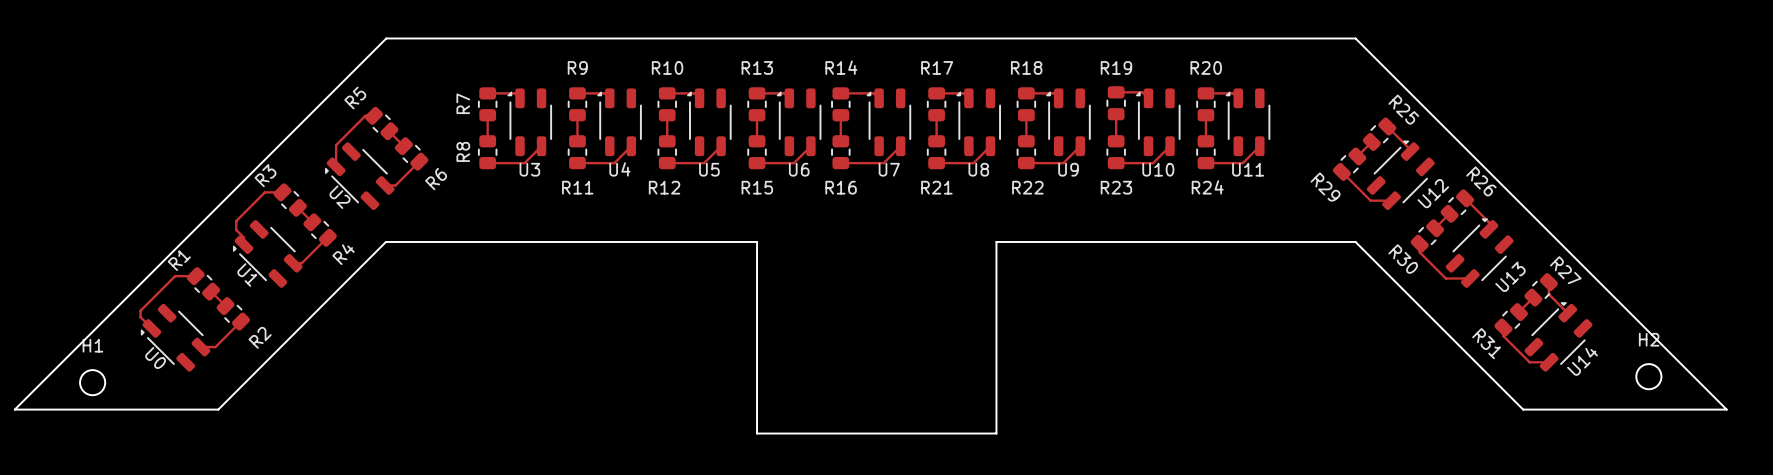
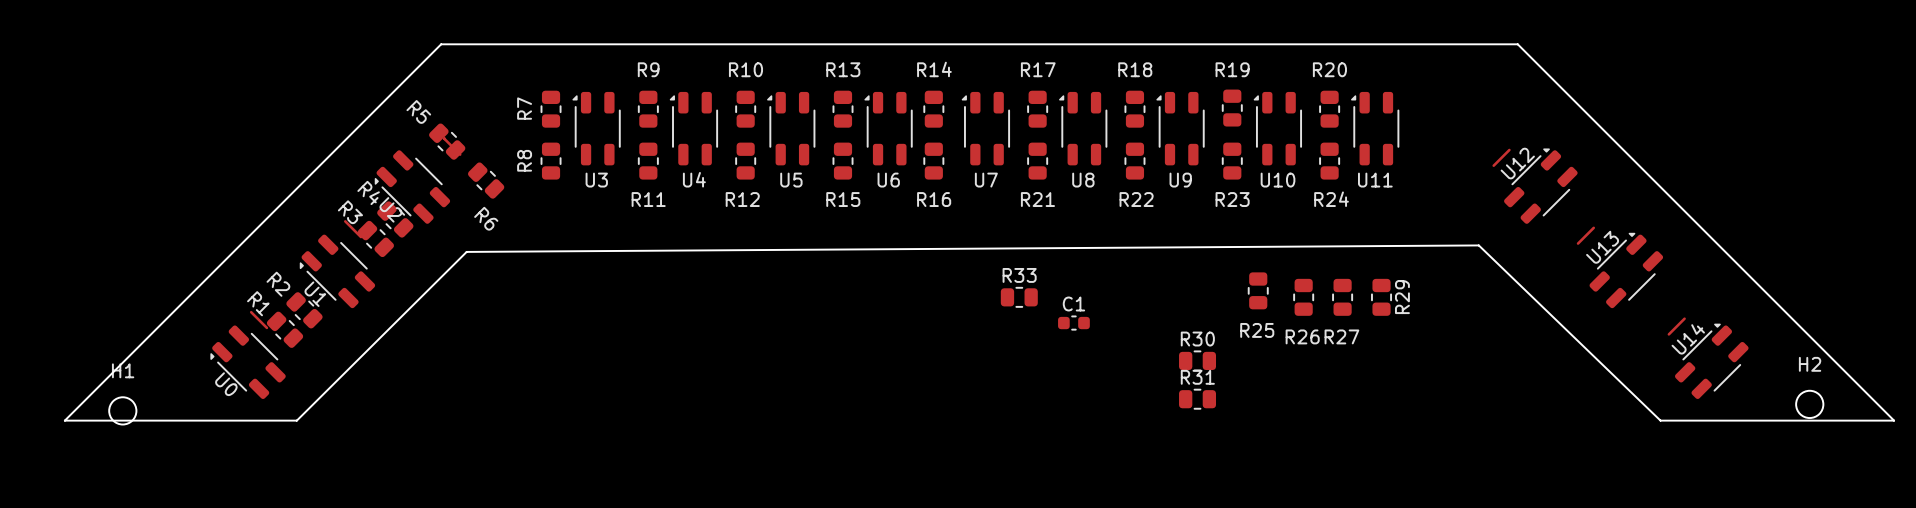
board edge: (386, 38) (14, 409) (218, 409) (385, 241) (757, 241) (757, 433) (996, 433) (996, 241) (1355, 241) (1523, 409) (1726, 409) (1355, 38) (386, 38) -> (441, 44) (64, 420) (296, 420) (466, 251) (1478, 245) (1660, 420) (1894, 420) (1517, 44) (441, 44)
track: (1116, 92) (1142, 92) (1148, 98) -> none
track: (487, 93) (515, 93) (520, 98) -> none
track: (577, 93) (604, 93) (609, 98) -> none
track: (667, 93) (694, 93) (699, 98) -> none
track: (757, 93) (784, 93) (789, 98) -> none
track: (840, 93) (874, 93) (879, 98) -> none
track: (936, 93) (963, 93) (968, 98) -> none
track: (1026, 93) (1053, 93) (1058, 98) -> none
track: (1205, 93) (1233, 93) (1238, 98) -> none
R5 name rotation: 0° (355, 98) -> 90° clockwise (418, 111)
R25 name position: R25 (1403, 109) -> R25 (1257, 330)
track: (1116, 114) (1116, 141) -> none
track: (373, 115) (365, 115) (336, 145) (336, 166) -> none
track: (487, 115) (487, 141) -> none
track: (577, 115) (577, 141) -> none
track: (667, 115) (667, 141) -> none
track: (757, 115) (757, 141) -> none
track: (840, 115) (840, 141) -> none
track: (936, 115) (936, 141) -> none
track: (1026, 115) (1026, 141) -> none
track: (1205, 115) (1205, 141) -> none
R5 position: (381, 123) -> (447, 141)
track: (1387, 126) (1410, 151) -> none
R25 rotation: 0° (1379, 134) -> 45° counterclockwise (1258, 290)
R25 position: (1379, 134) -> (1258, 290)
track: (541, 146) (524, 163) (487, 163) -> none
track: (631, 146) (614, 163) (577, 163) -> none
track: (721, 146) (704, 163) (667, 163) -> none
track: (810, 146) (793, 163) (757, 163) -> none
track: (900, 146) (883, 163) (840, 163) -> none
track: (990, 146) (973, 163) (936, 163) -> none
track: (1080, 146) (1063, 163) (1026, 163) -> none
track: (1170, 146) (1153, 163) (1116, 163) -> none
track: (1259, 146) (1242, 163) (1205, 163) -> none
R6 position: (411, 153) -> (486, 180)
track: (419, 161) (395, 185) (385, 185) -> none
R29 rotation: 0° (1349, 164) -> 45° counterclockwise (1381, 297)
R29 position: (1349, 164) -> (1381, 297)
track: (1341, 171) (1370, 200) (1391, 200) -> none
R3 name rotation: 0° (265, 175) -> 90° clockwise (350, 212)
R6 name rotation: 0° (436, 179) -> 90° clockwise (486, 218)
R26 name position: R26 (1481, 181) -> R26 (1302, 336)
R29 name position: R29 (1325, 186) -> R29 (1402, 297)
track: (282, 192) (264, 192) (236, 221) (236, 230) (243, 237) (243, 244) -> none
U12 name position: U12 (1433, 193) -> U12 (1517, 163)
track: (1465, 198) (1488, 222) (1488, 229) -> none
R3 position: (290, 200) -> (375, 238)
R26 rotation: 0° (1457, 206) -> 45° counterclockwise (1303, 297)
R26 position: (1457, 206) -> (1303, 297)
R4 position: (320, 230) -> (395, 219)
R30 rotation: 0° (1427, 236) -> 45° clockwise (1197, 360)
R30 position: (1427, 236) -> (1197, 360)
track: (327, 237) (301, 263) (293, 263) -> none
track: (1419, 243) (1419, 252) (1445, 278) (1470, 278) -> none
U1 position: (267, 253) -> (337, 271)
R4 name rotation: 0° (343, 254) -> 90° clockwise (368, 192)
R4 name position: R4 (343, 254) -> R4 (368, 192)
R30 name position: R30 (1403, 259) -> R30 (1197, 339)
R1 name rotation: 0° (179, 260) -> 90° clockwise (258, 303)
R27 name position: R27 (1565, 270) -> R27 (1341, 336)
track: (195, 276) (175, 276) (140, 310) (140, 317) (151, 328) -> none
U13 name position: U13 (1510, 276) -> U13 (1602, 247)
R33: none -> (1019, 297)
track: (1548, 282) (1548, 294) (1567, 313) -> none
R1 position: (203, 283) -> (285, 329)
R27 rotation: 0° (1541, 289) -> 45° counterclockwise (1342, 297)
R27 position: (1541, 289) -> (1342, 297)
C1: none -> (1073, 323)
R2 position: (233, 313) -> (304, 310)
R31 rotation: 0° (1511, 319) -> 45° clockwise (1197, 399)
R31 position: (1511, 319) -> (1197, 399)
track: (241, 321) (215, 347) (200, 347) -> none
track: (1503, 327) (1503, 336) (1529, 362) (1549, 362) -> none
U0 position: (175, 337) -> (248, 362)
R2 name rotation: 0° (260, 337) -> 90° clockwise (278, 284)
R2 name position: R2 (260, 337) -> R2 (278, 284)
R31 name position: R31 (1486, 343) -> R31 (1197, 377)
U14 name position: U14 (1582, 361) -> U14 (1688, 339)

